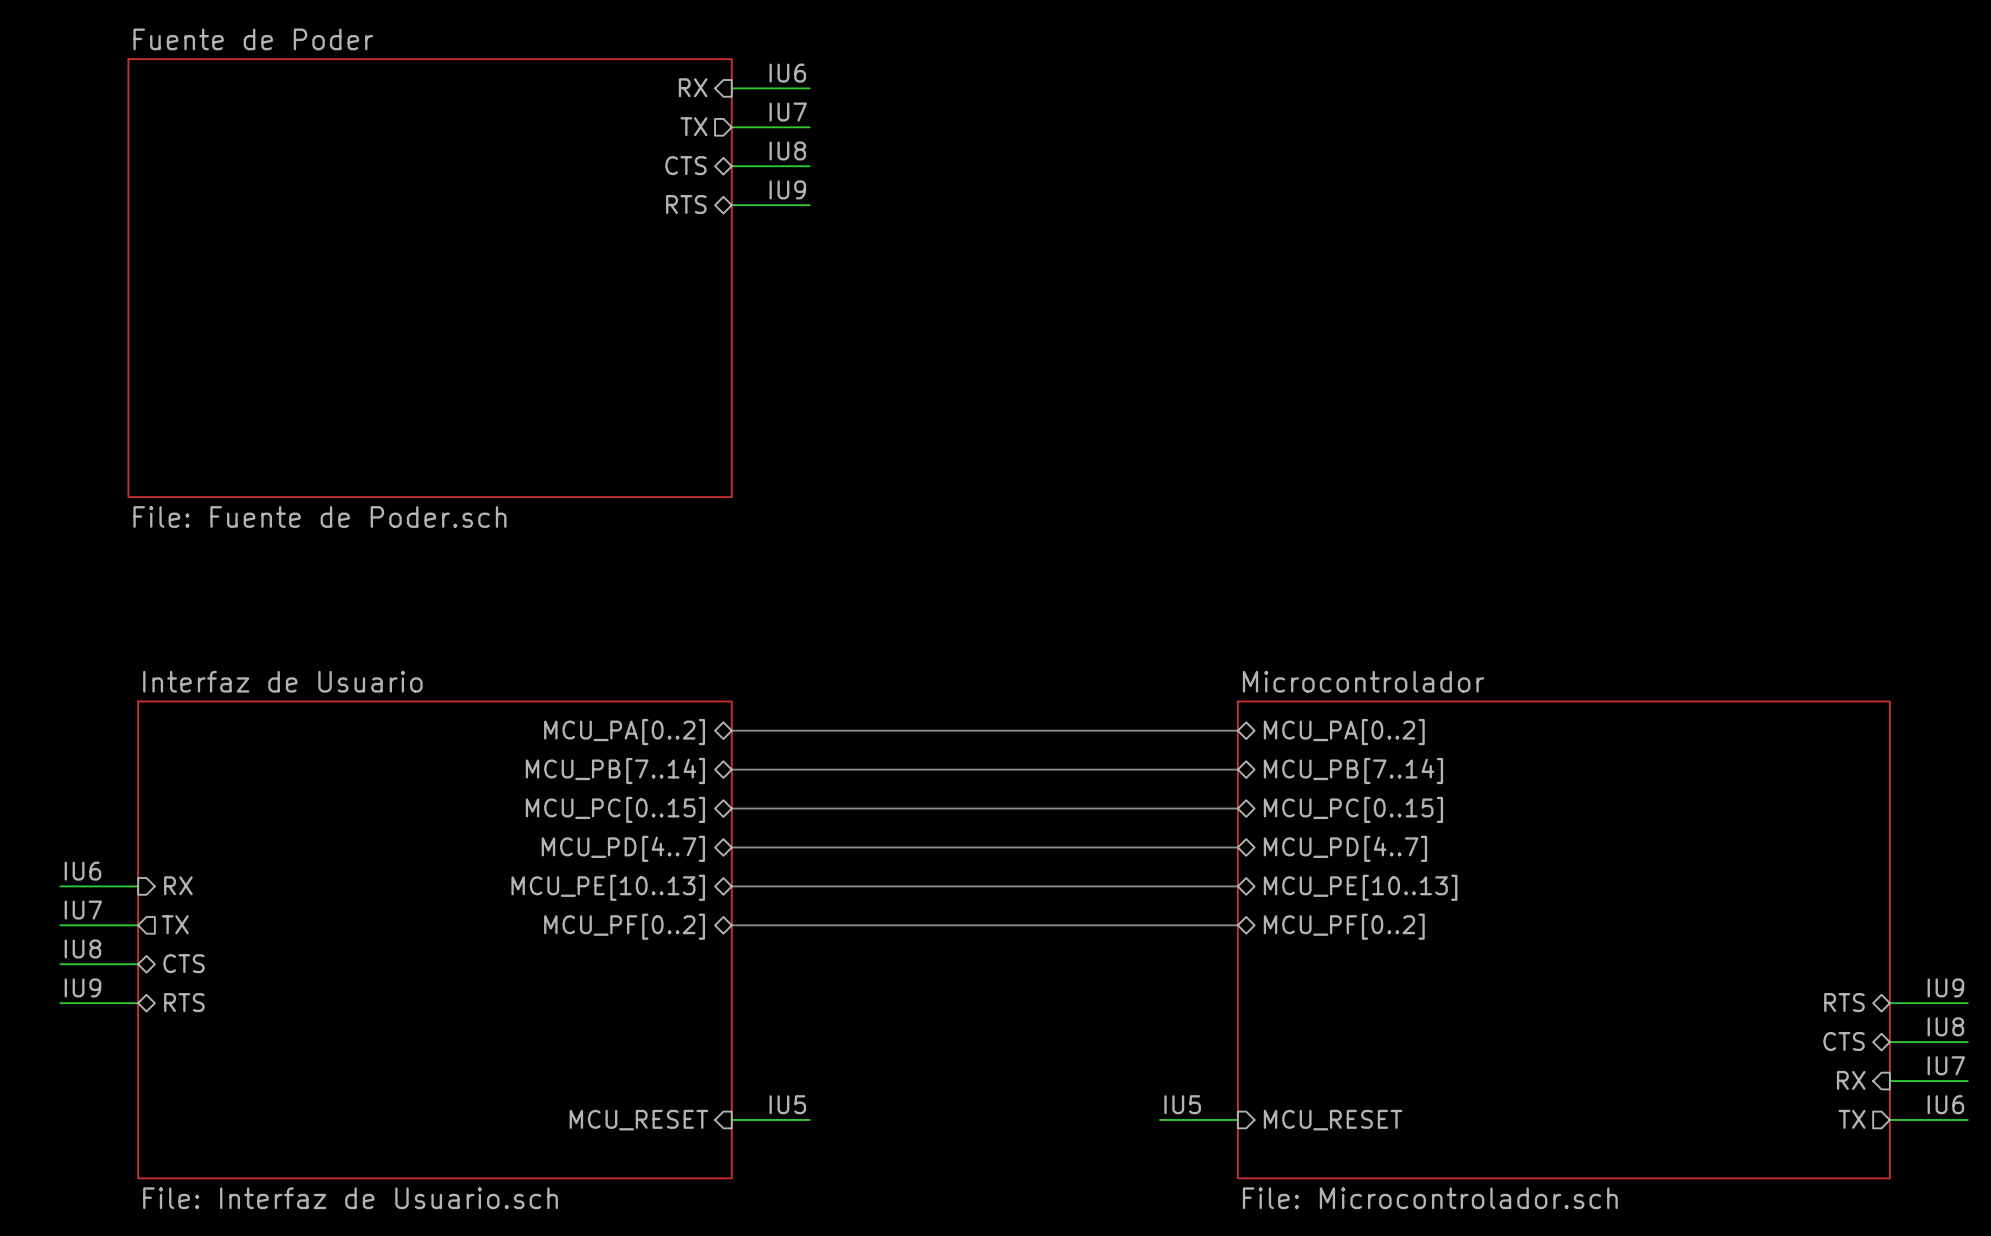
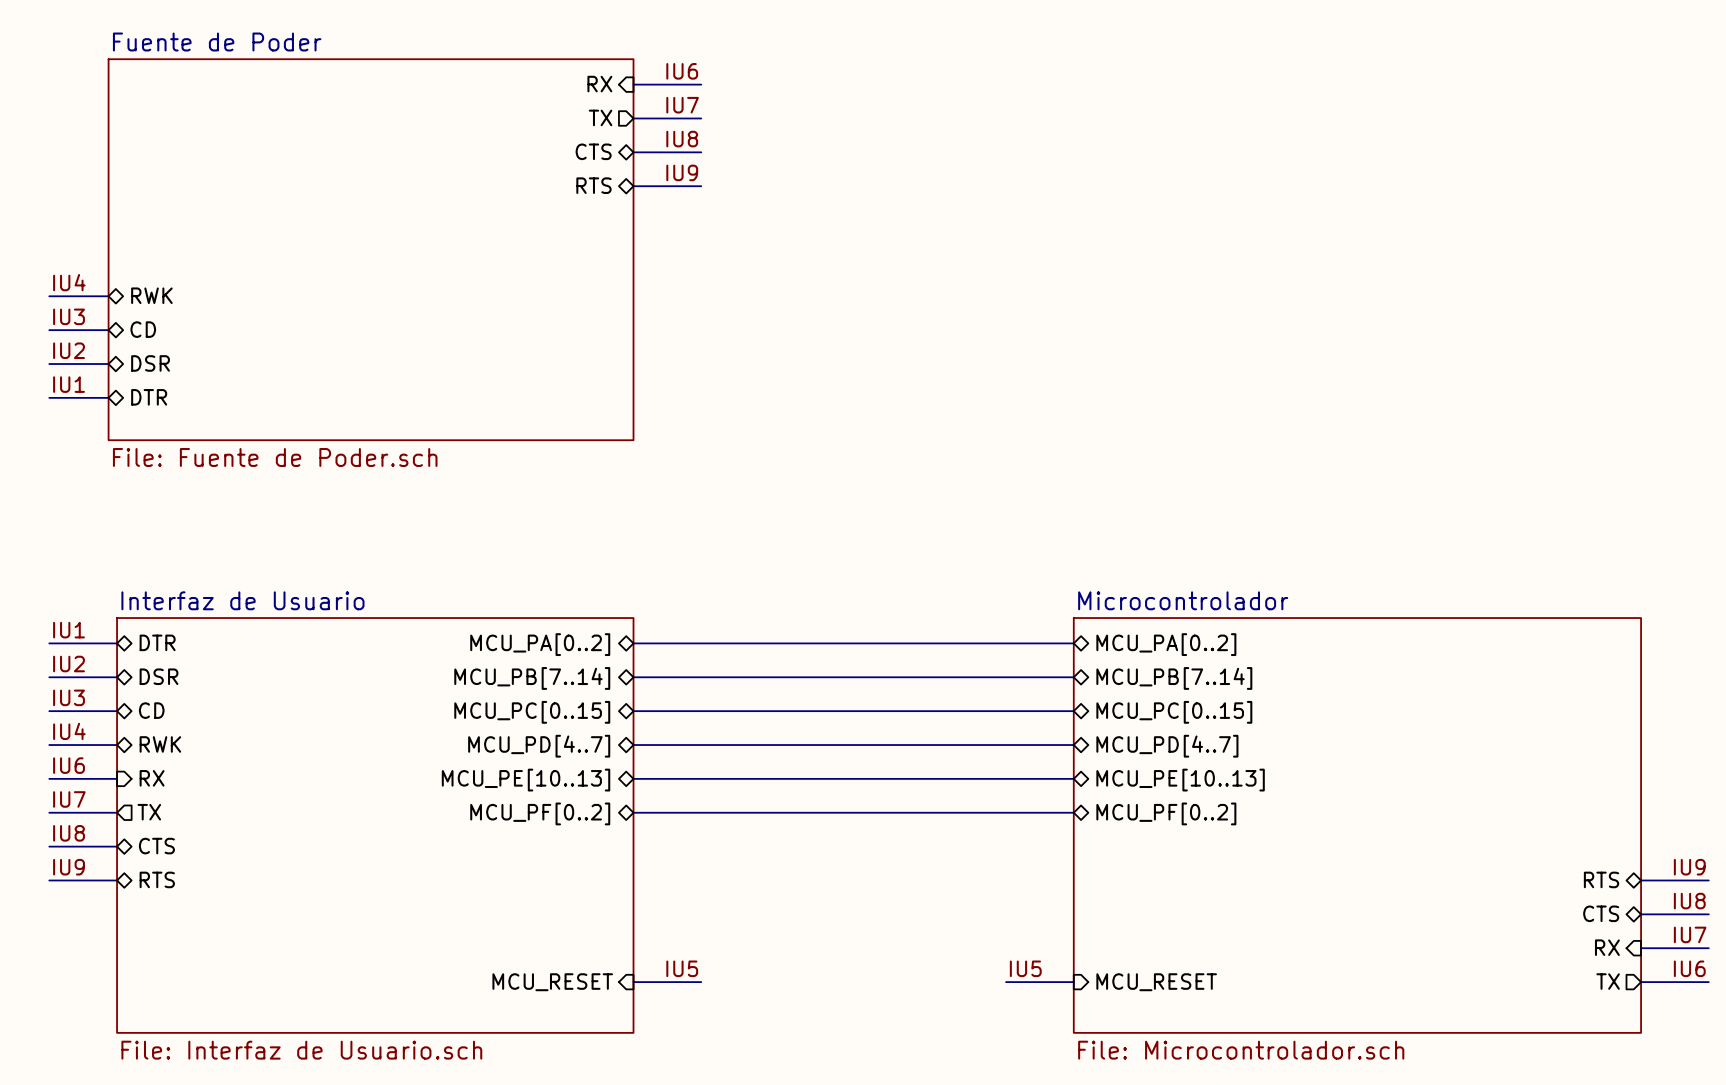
label: none -> IU4 (69, 282)
wire: none -> (49, 296) (108, 296)
sheet pin: none -> RWK (151, 295)
label: none -> IU3 (69, 316)
sheet pin: none -> CD (143, 329)
wire: none -> (49, 330) (108, 330)
label: none -> IU2 (69, 350)
sheet pin: none -> DSR (150, 363)
wire: none -> (49, 364) (108, 364)
label: none -> IU1 (69, 384)
sheet pin: none -> DTR (149, 397)
wire: none -> (49, 397) (108, 397)
label: none -> IU1 (69, 630)
wire: none -> (49, 643) (117, 643)
sheet pin: none -> DTR (157, 642)
label: none -> IU2 (69, 664)
sheet pin: none -> DSR (159, 676)
wire: none -> (49, 677) (117, 677)
label: none -> IU3 (69, 697)
sheet pin: none -> CD (151, 710)
wire: none -> (49, 711) (117, 711)
label: none -> IU4 (69, 731)
sheet pin: none -> RWK (160, 744)
wire: none -> (49, 745) (117, 745)

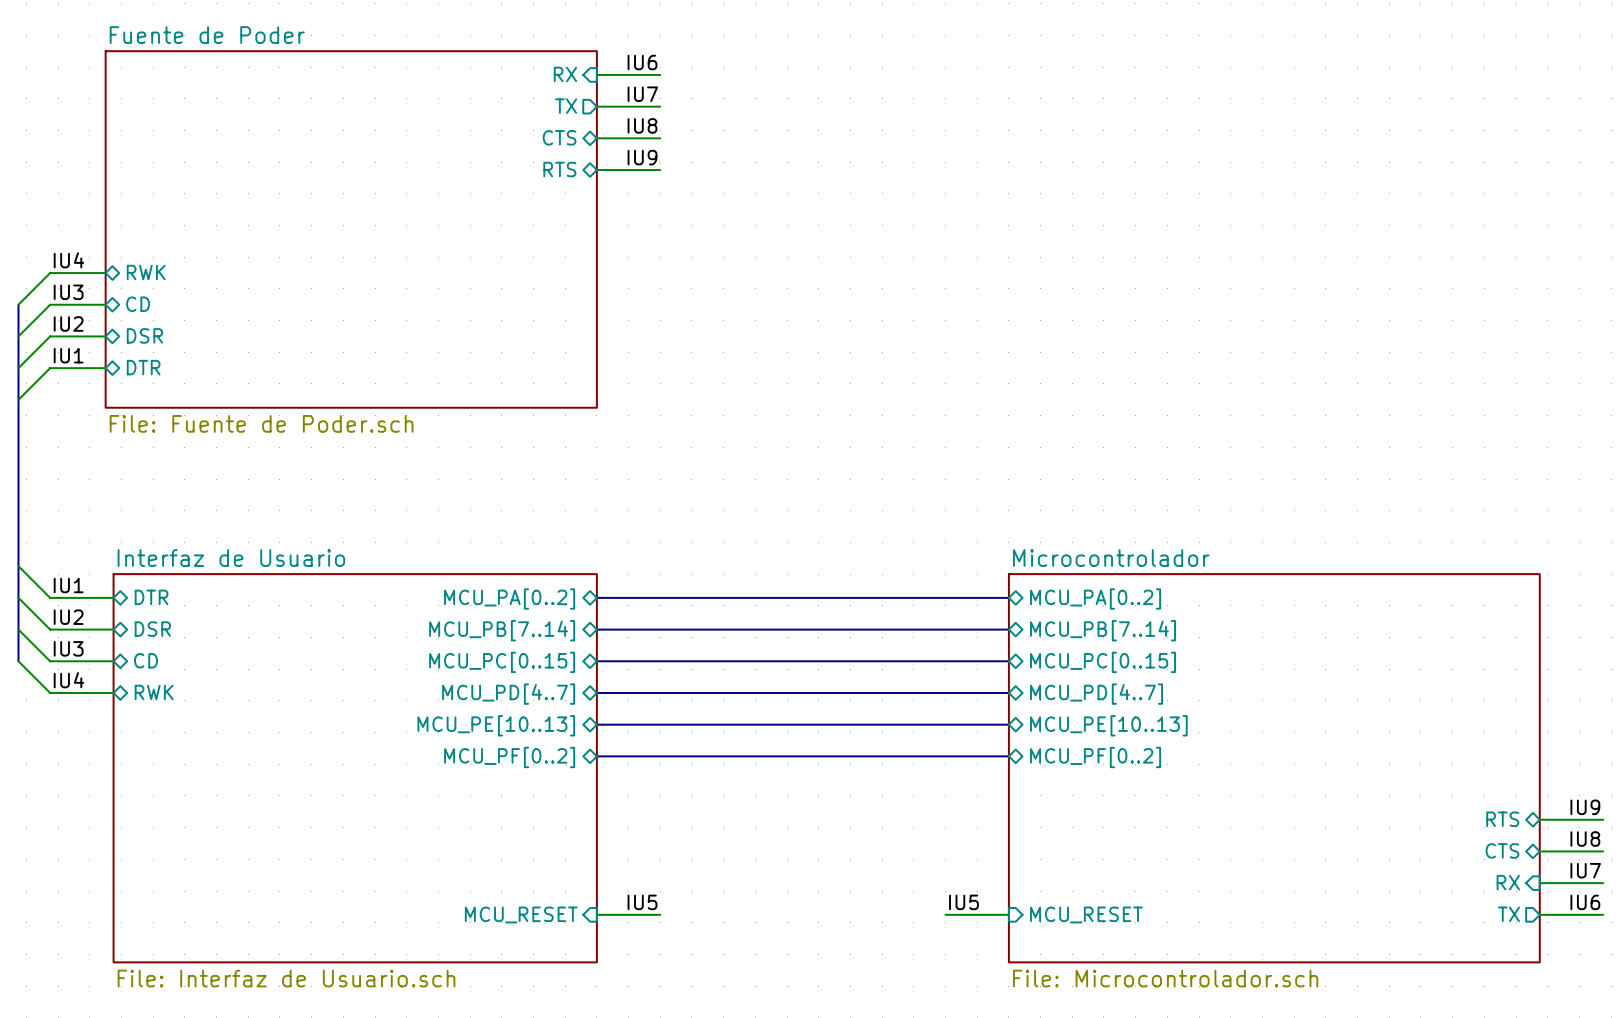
wire: none -> (50, 273) (18, 304)
bus: none -> (18, 304) (18, 661)
wire: none -> (50, 304) (18, 336)
wire: none -> (50, 336) (18, 368)
wire: none -> (50, 368) (18, 399)
wire: none -> (18, 566) (50, 597)
wire: none -> (18, 597) (50, 629)
wire: none -> (18, 629) (50, 661)
wire: none -> (18, 661) (50, 692)
label: IU6 (69, 765) -> none
wire: (49, 778) (117, 778) -> none
sheet pin: RX (152, 778) -> none
label: IU7 (69, 799) -> none
wire: (49, 812) (117, 812) -> none
sheet pin: TX (149, 812) -> none
label: IU8 (69, 833) -> none
wire: (49, 846) (117, 846) -> none
sheet pin: CTS (156, 846) -> none
label: IU9 (69, 867) -> none
sheet pin: RTS (157, 879) -> none
wire: (49, 880) (117, 880) -> none

